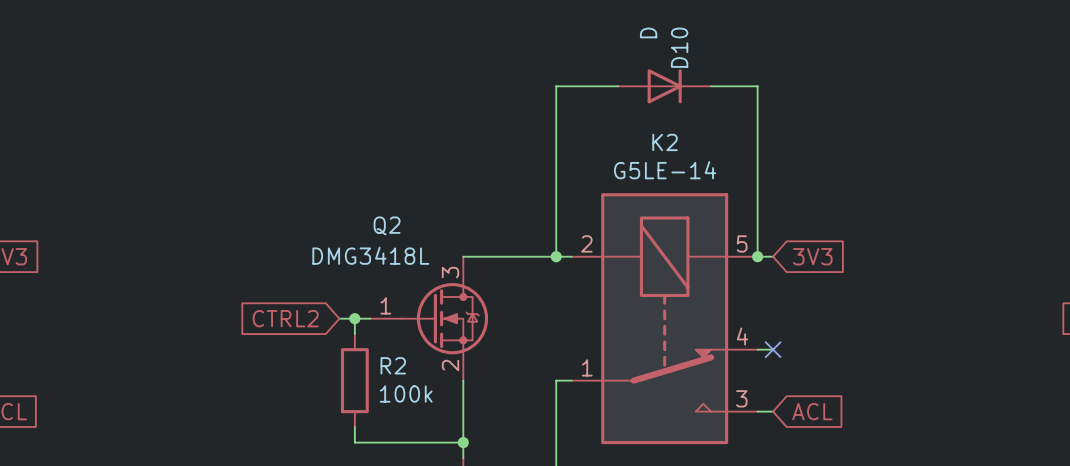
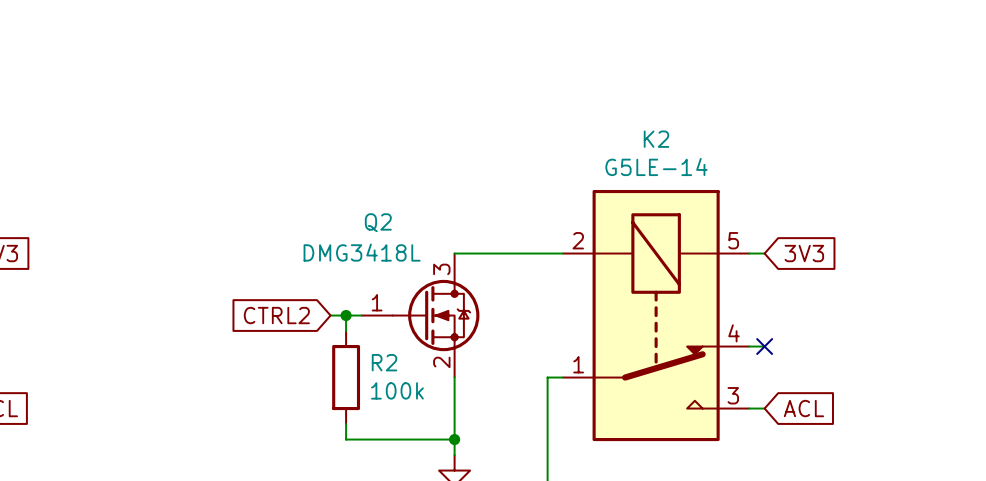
wire: (618, 86) (556, 86) (556, 256) -> none
D10: D (664, 86) -> none
wire: (711, 86) (757, 86) (757, 256) -> none
junction: (556, 256) -> none
junction: (757, 256) -> none

